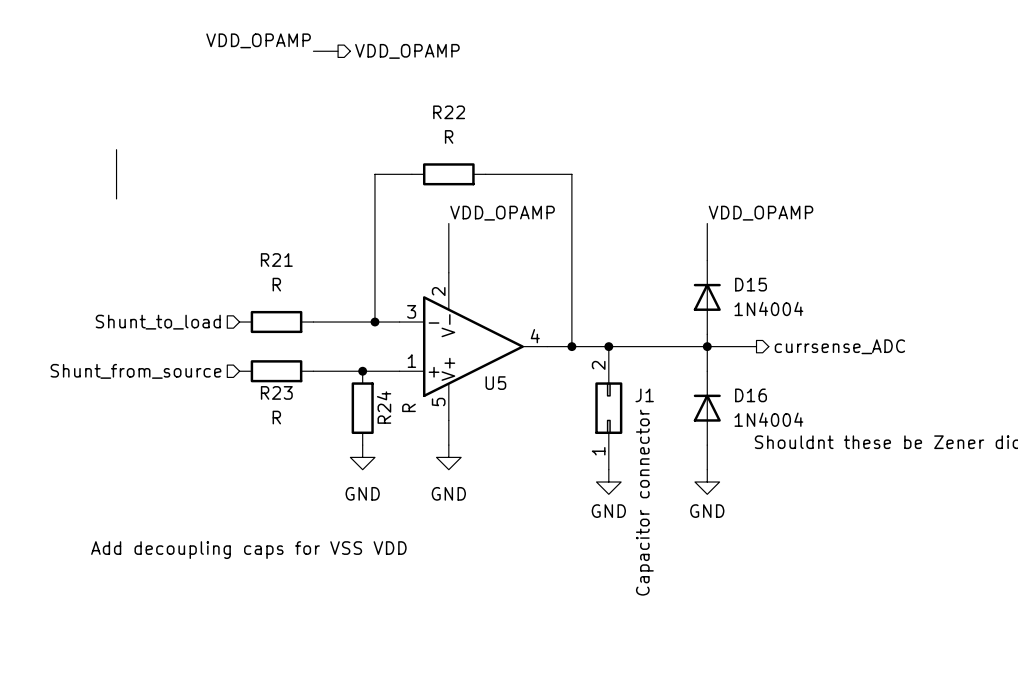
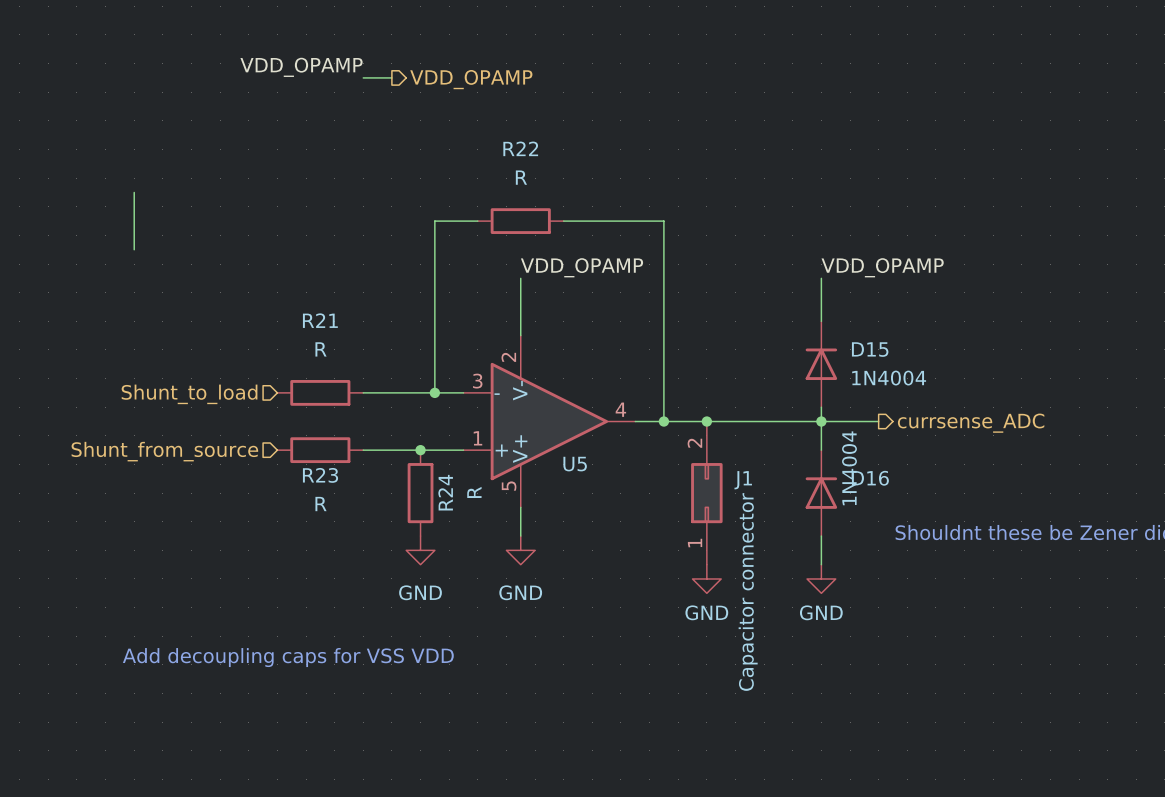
D16 value rotation: 0° (768, 419) -> 90° counterclockwise (849, 468)

